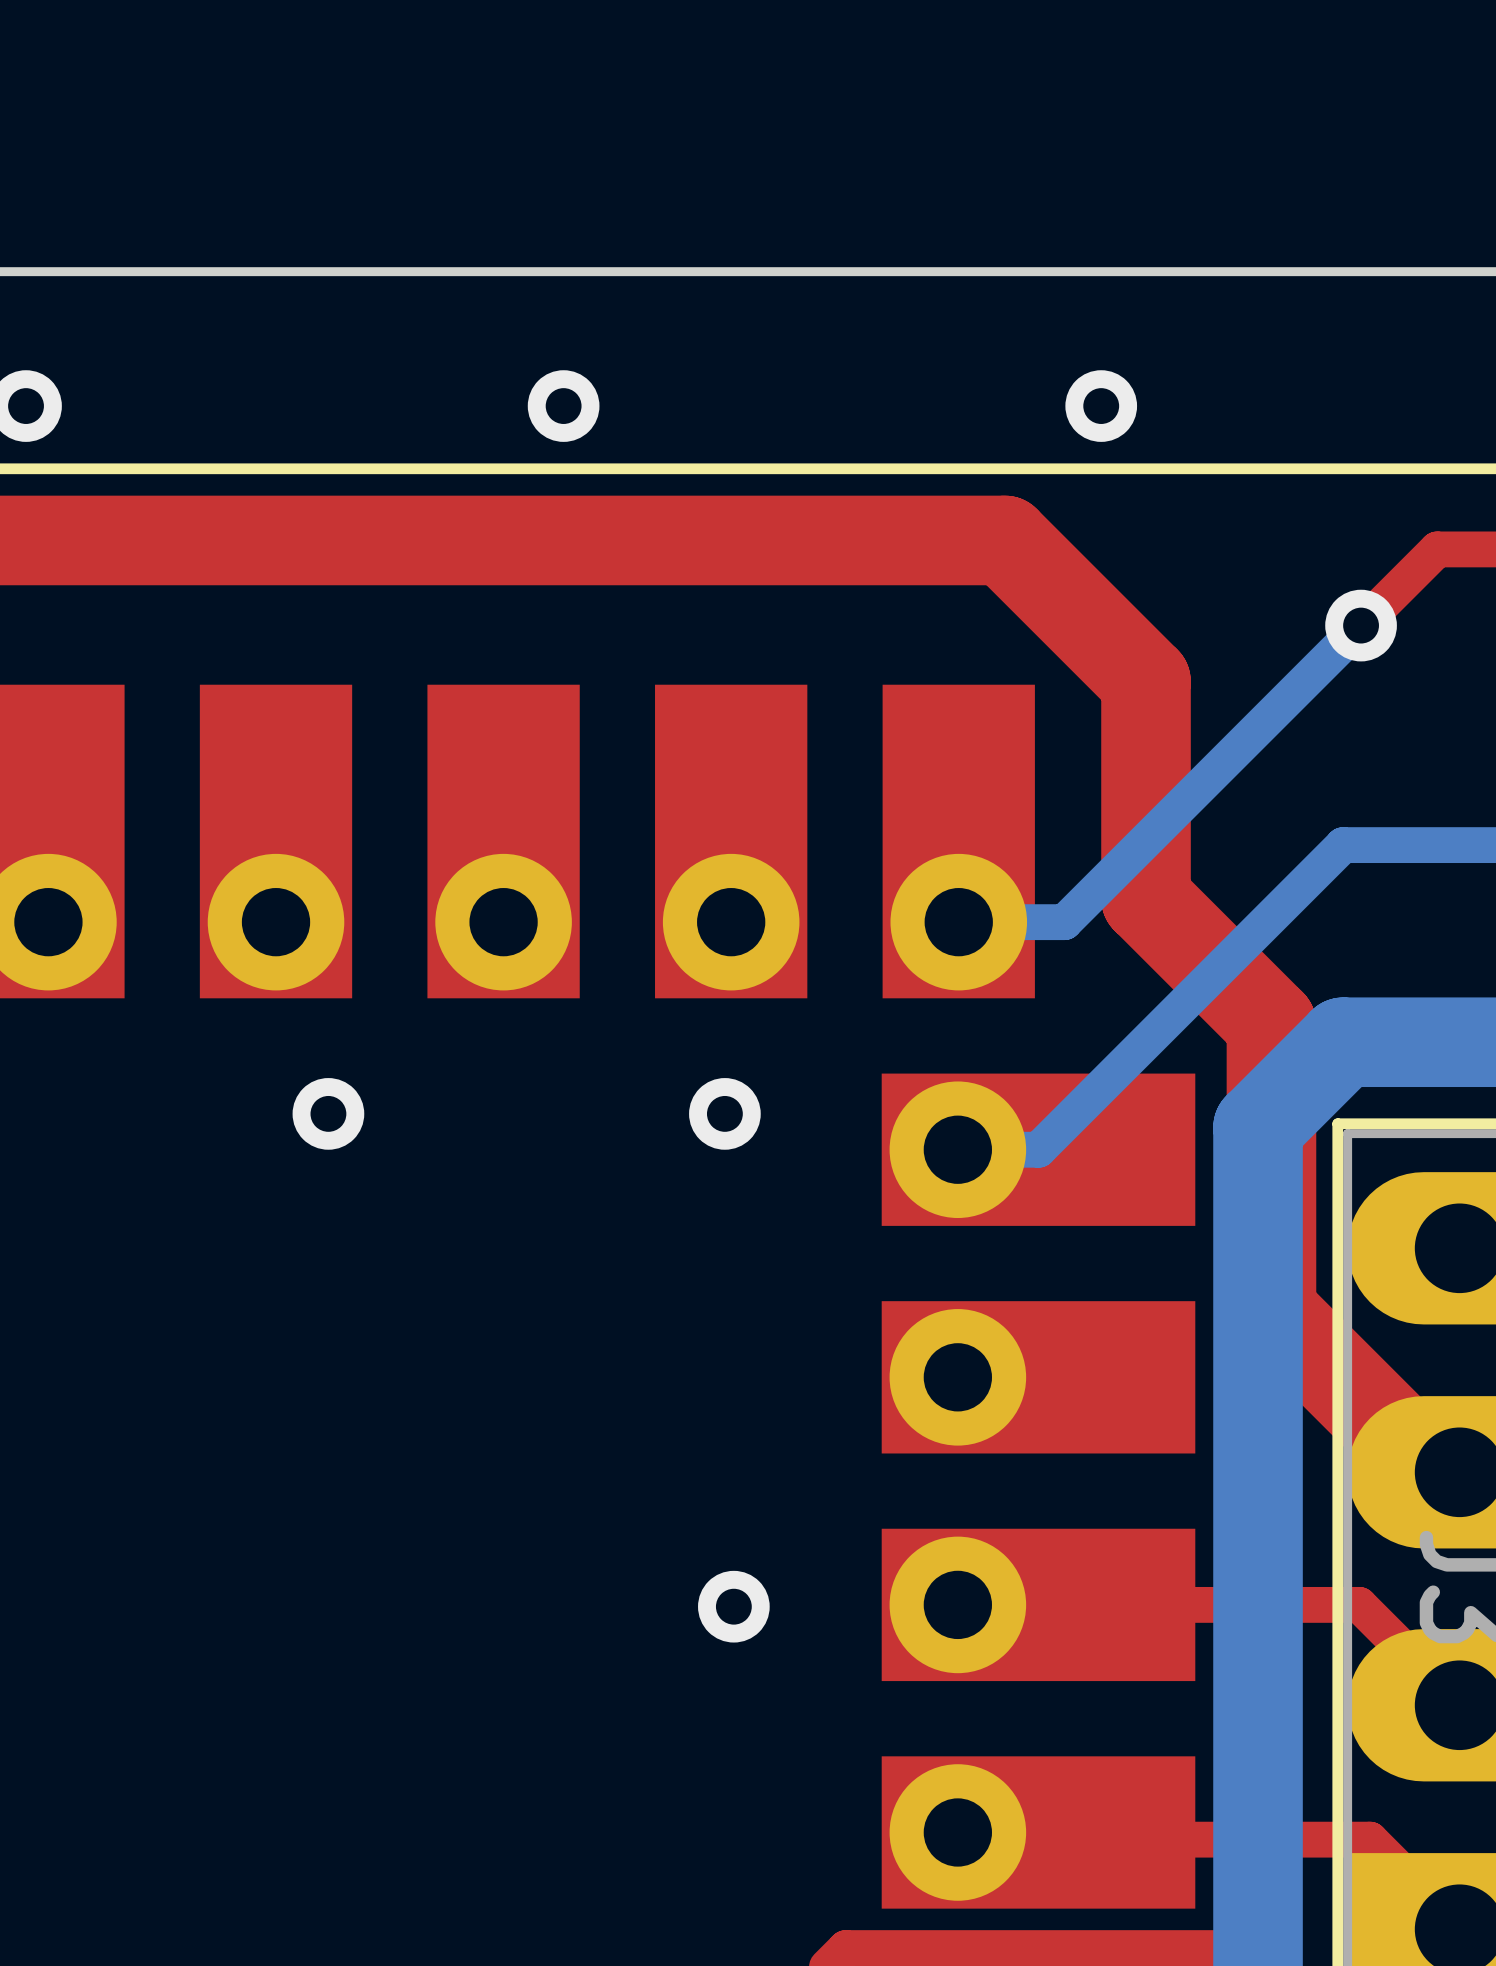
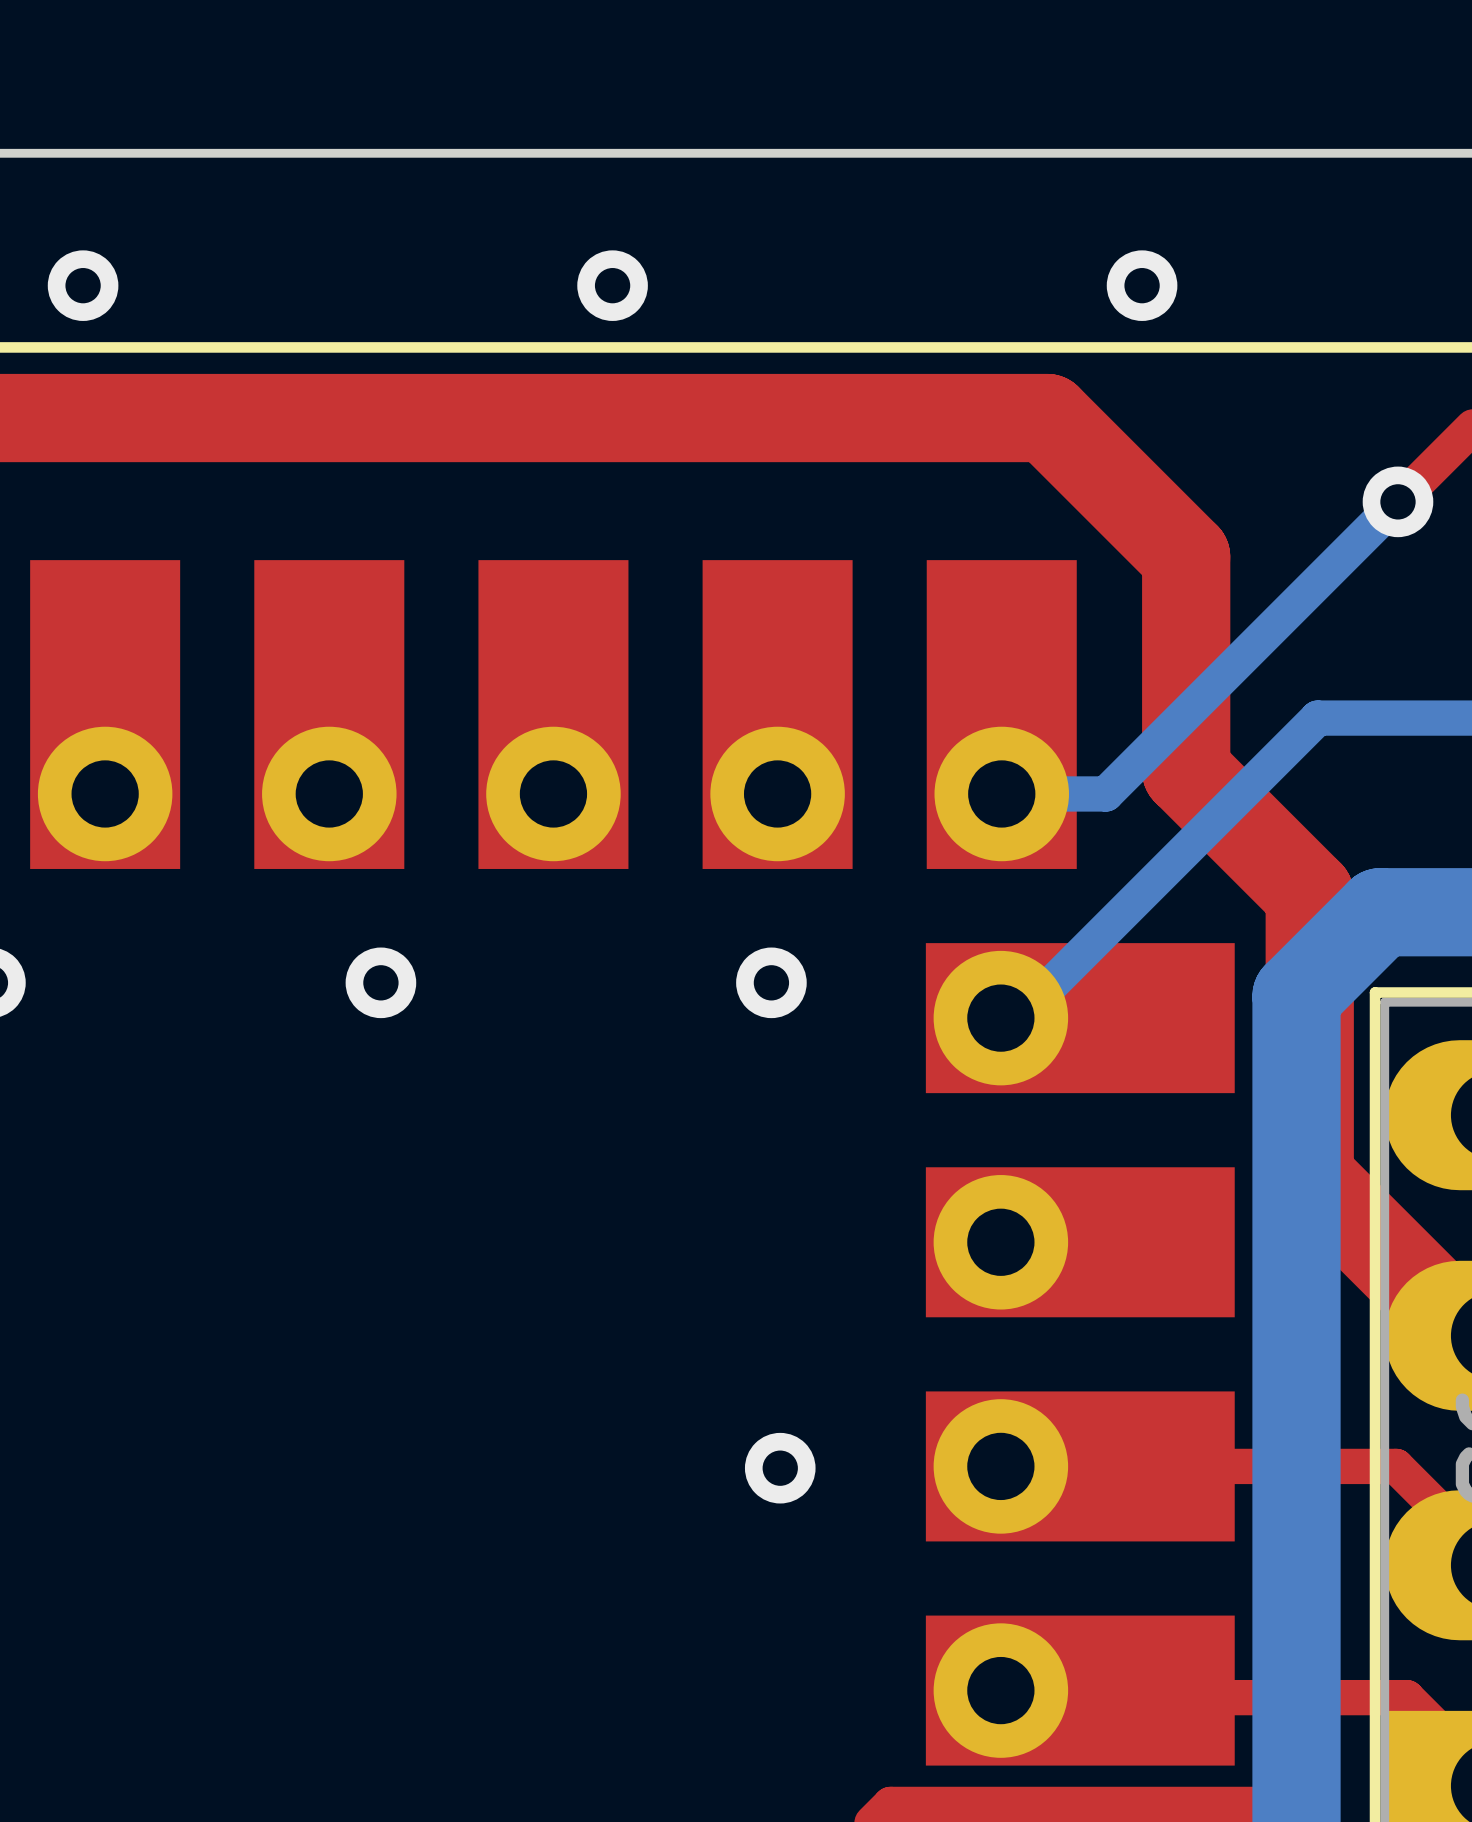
bottom track: (1343, 845) (1038, 1149) (974, 1149) -> (1380, 718) (1317, 718) (1017, 1018)

